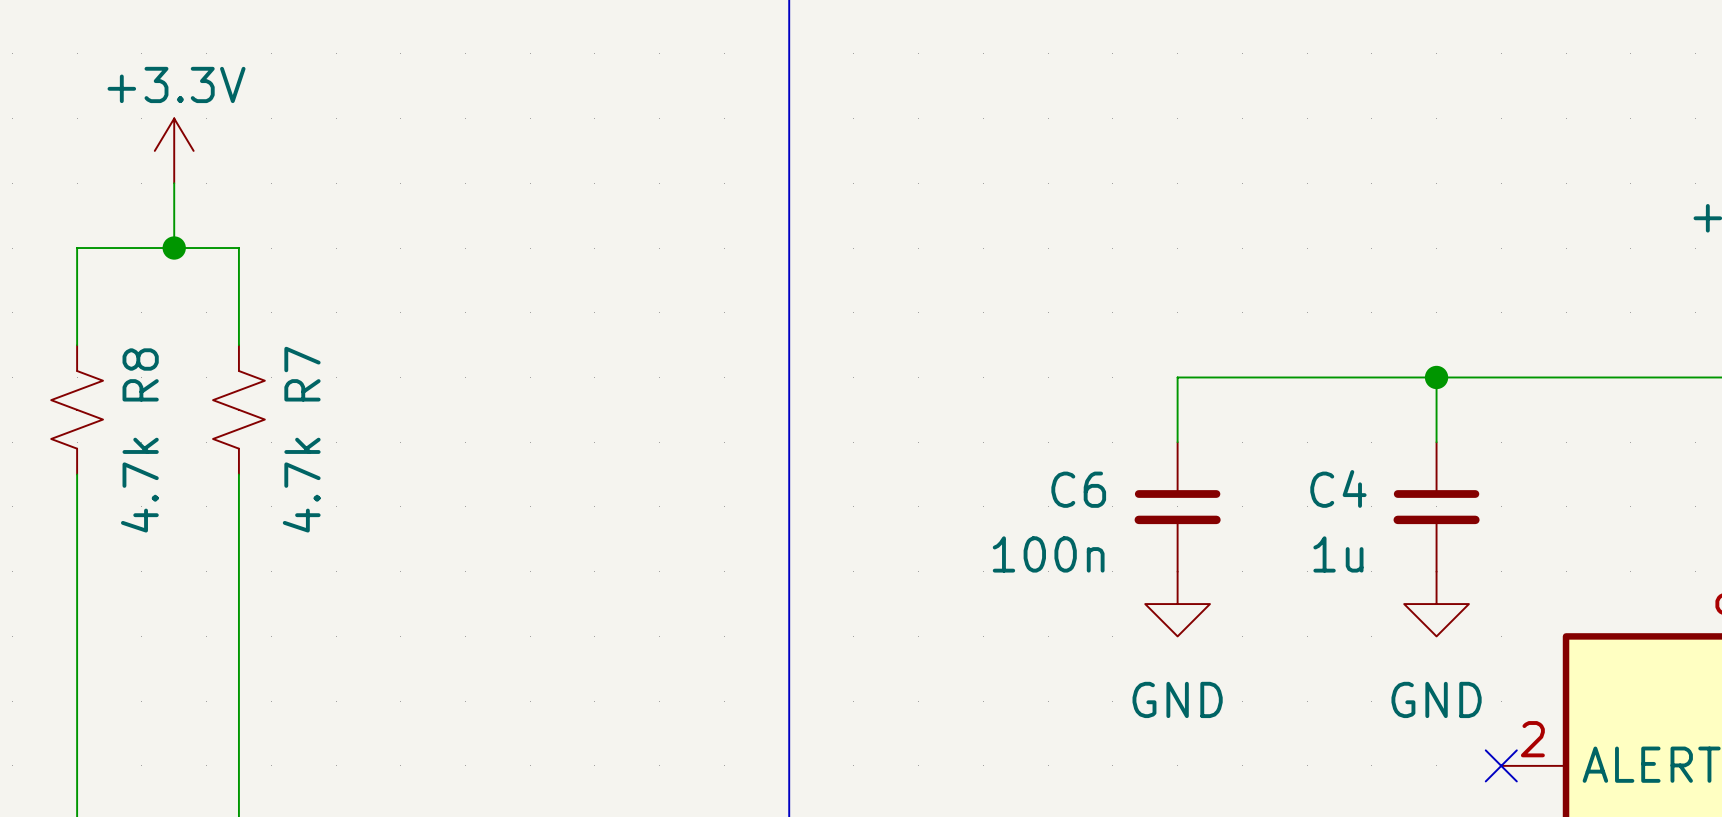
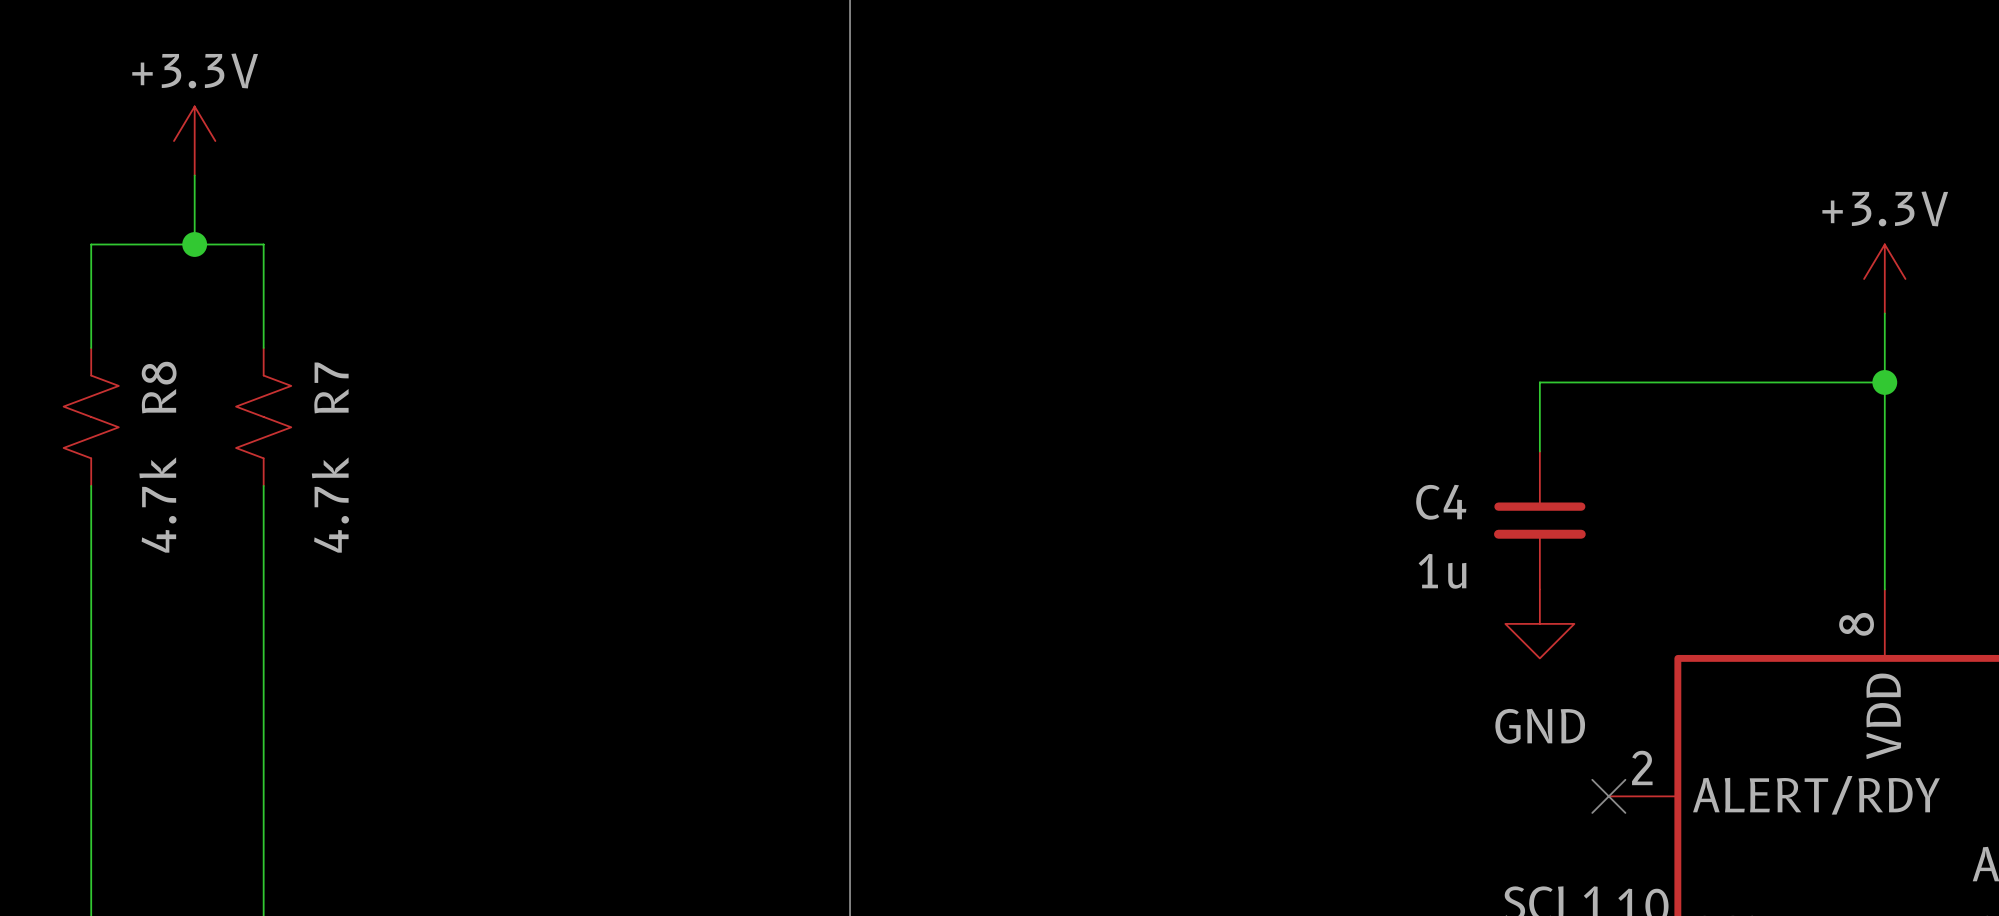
wire: (1436, 377) (1177, 377) (1177, 442) -> none
junction: (1436, 377) -> none
C6: 100n (1177, 506) -> none
power symbol: GND (1177, 604) -> none

